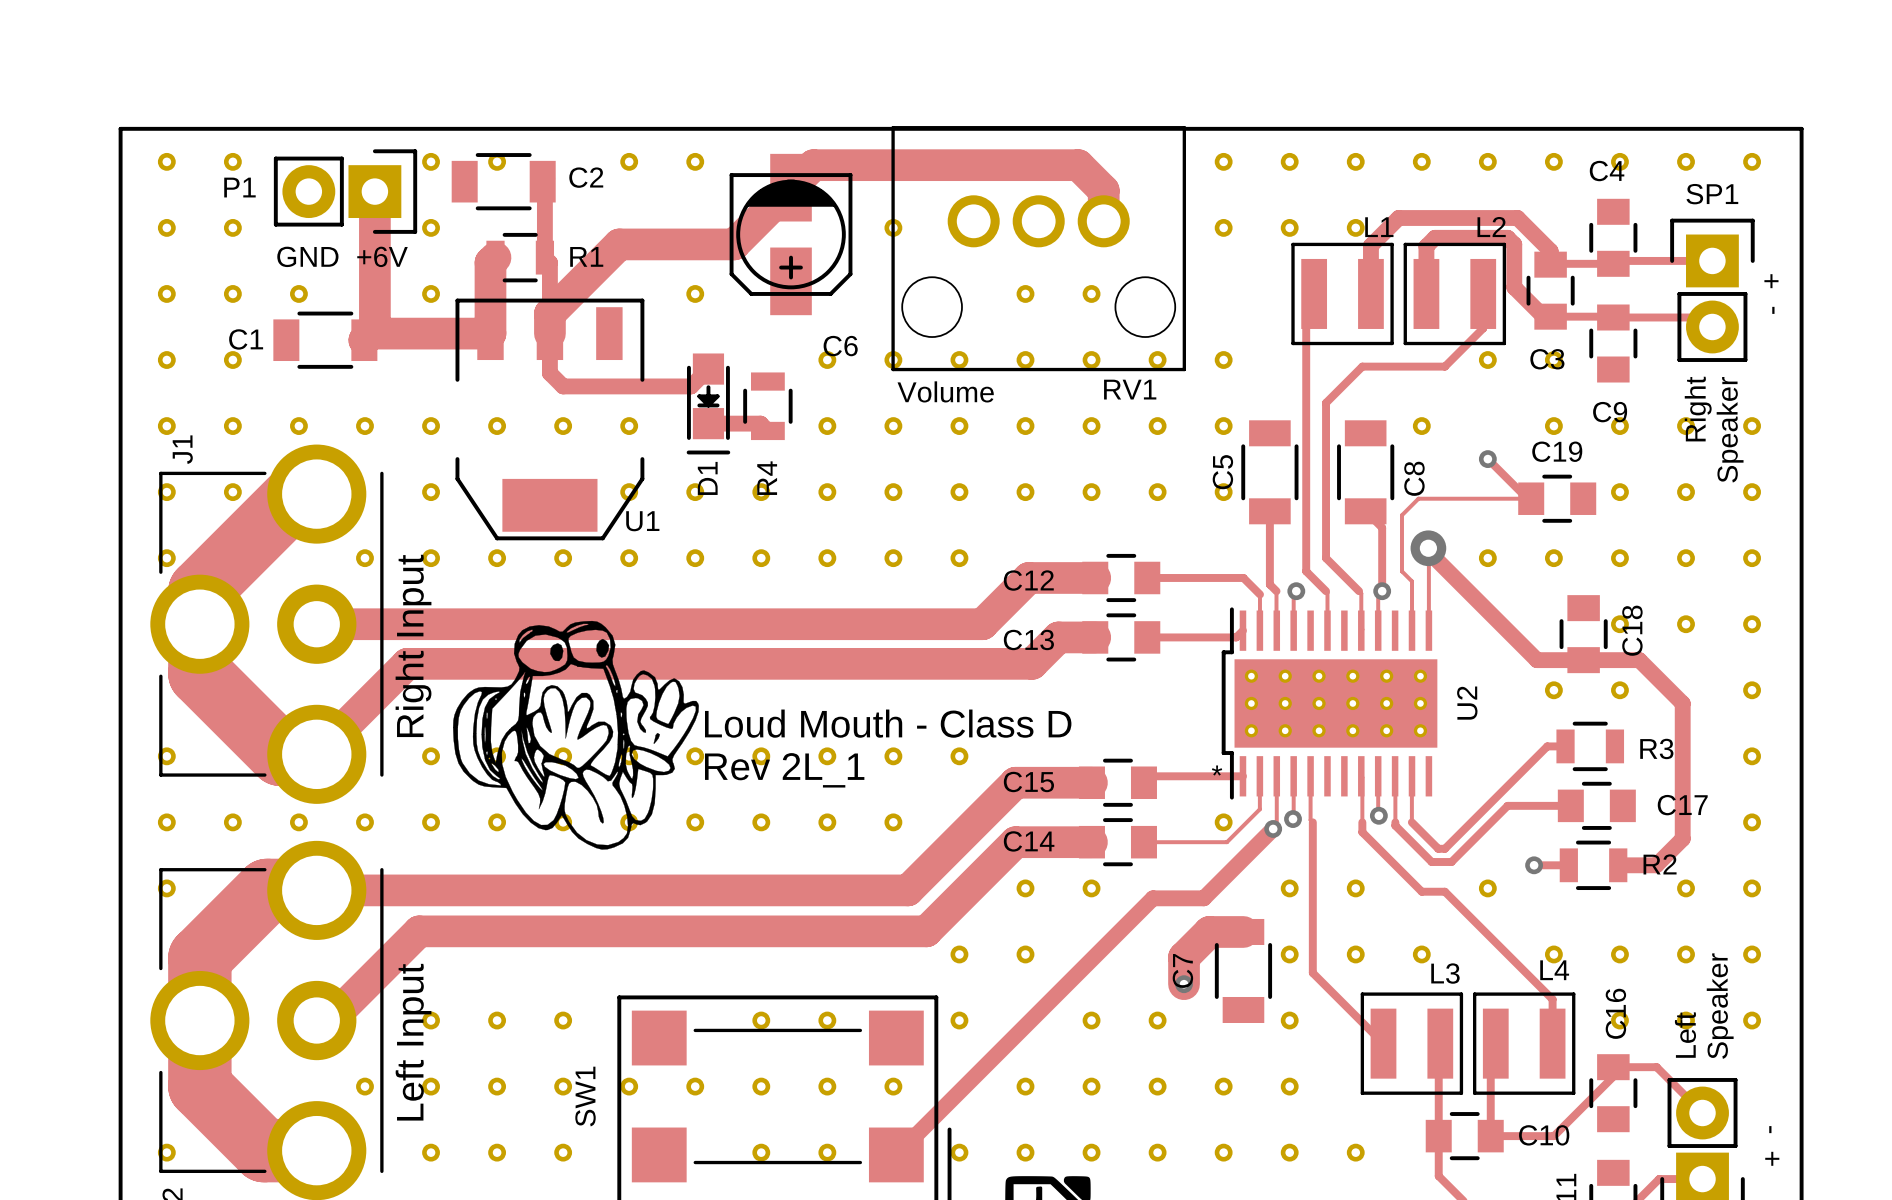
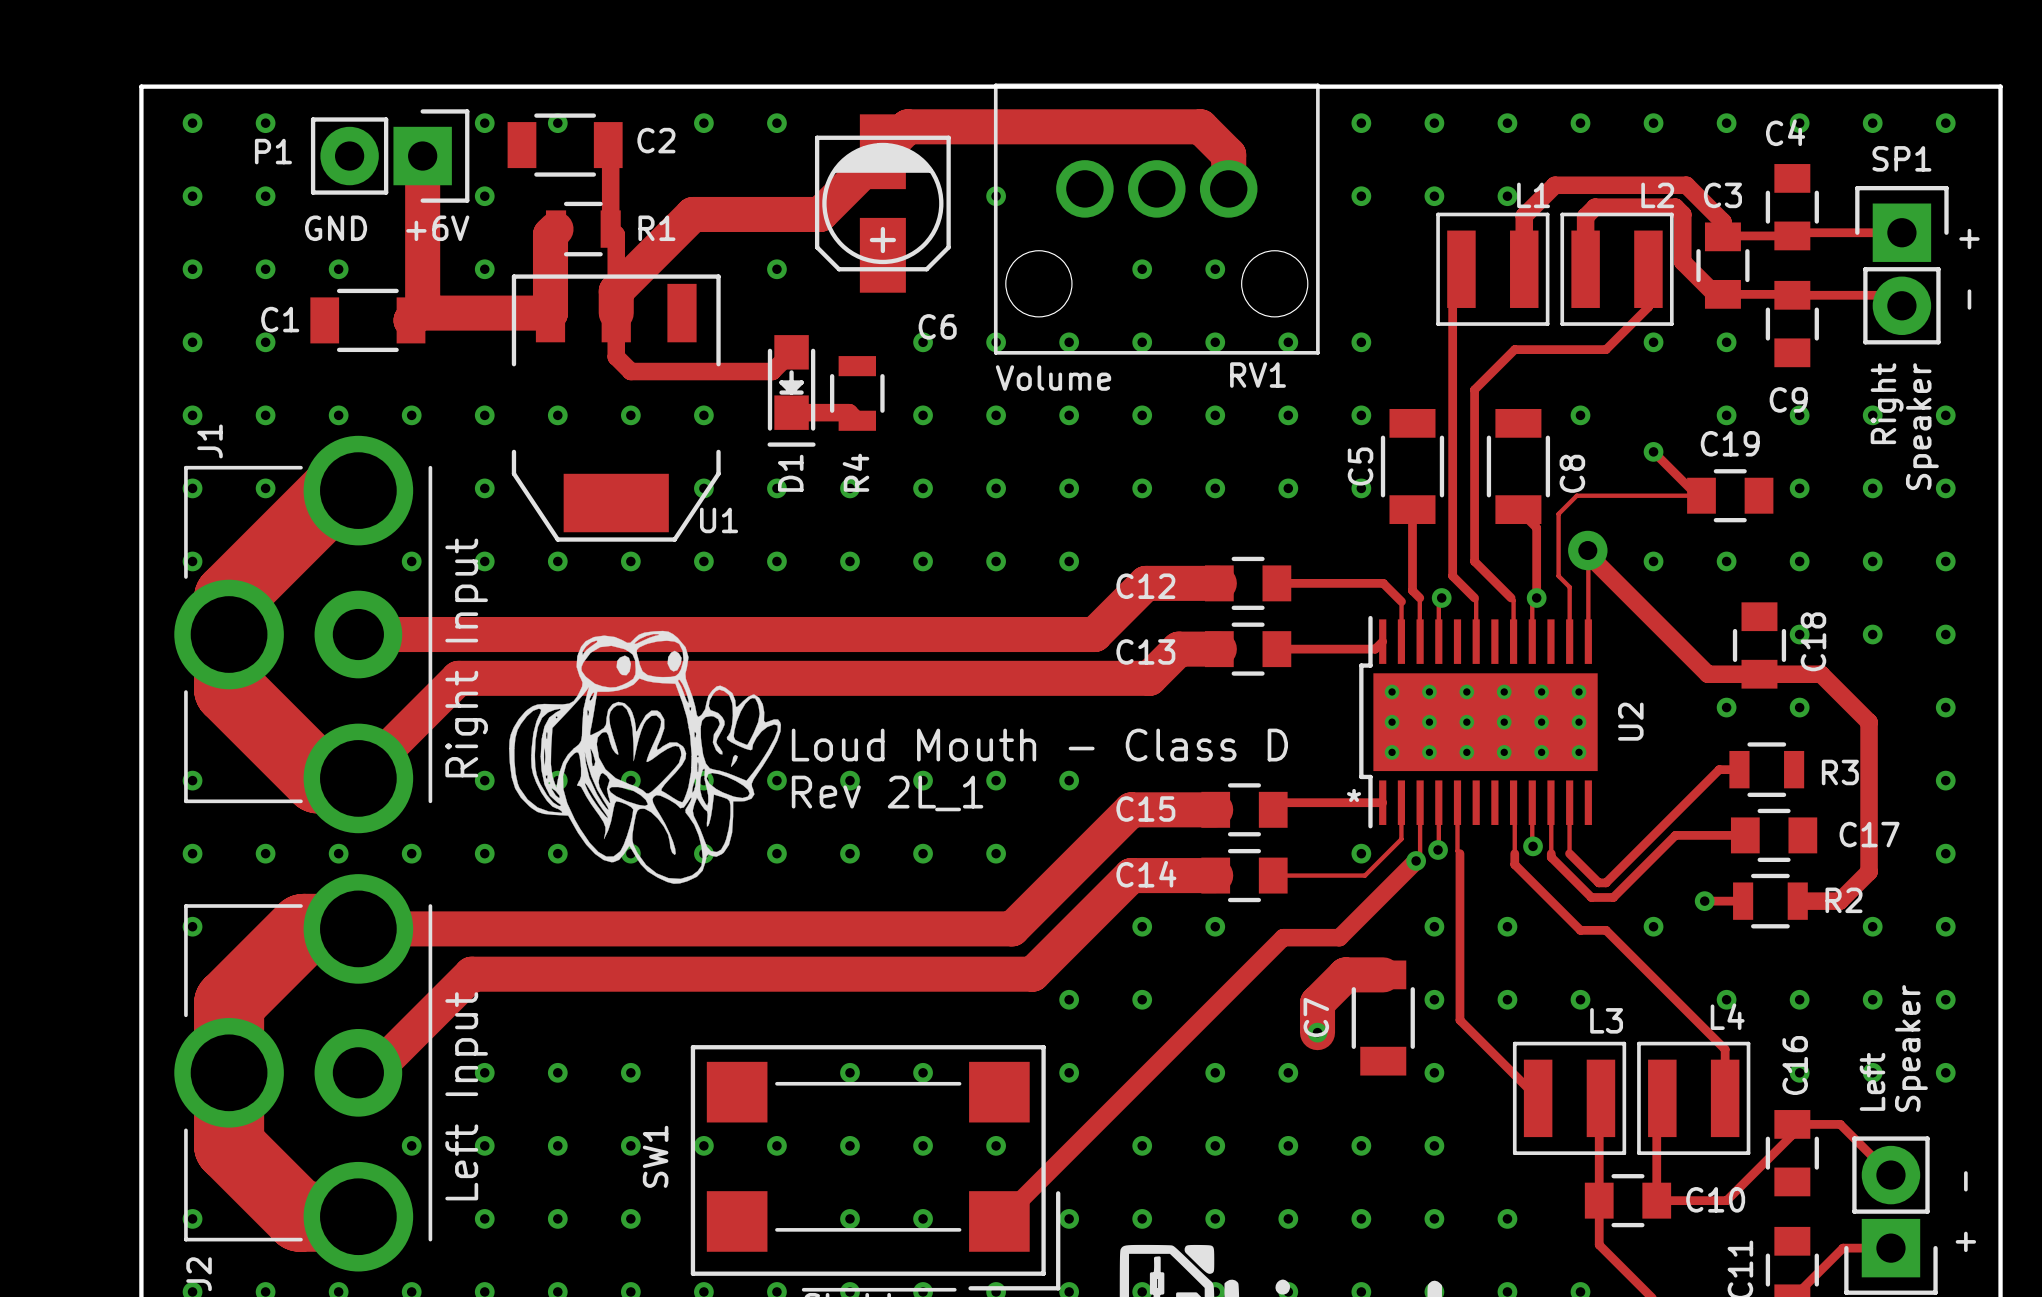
C3 name position: C3 (1547, 359) -> C3 (1722, 195)

